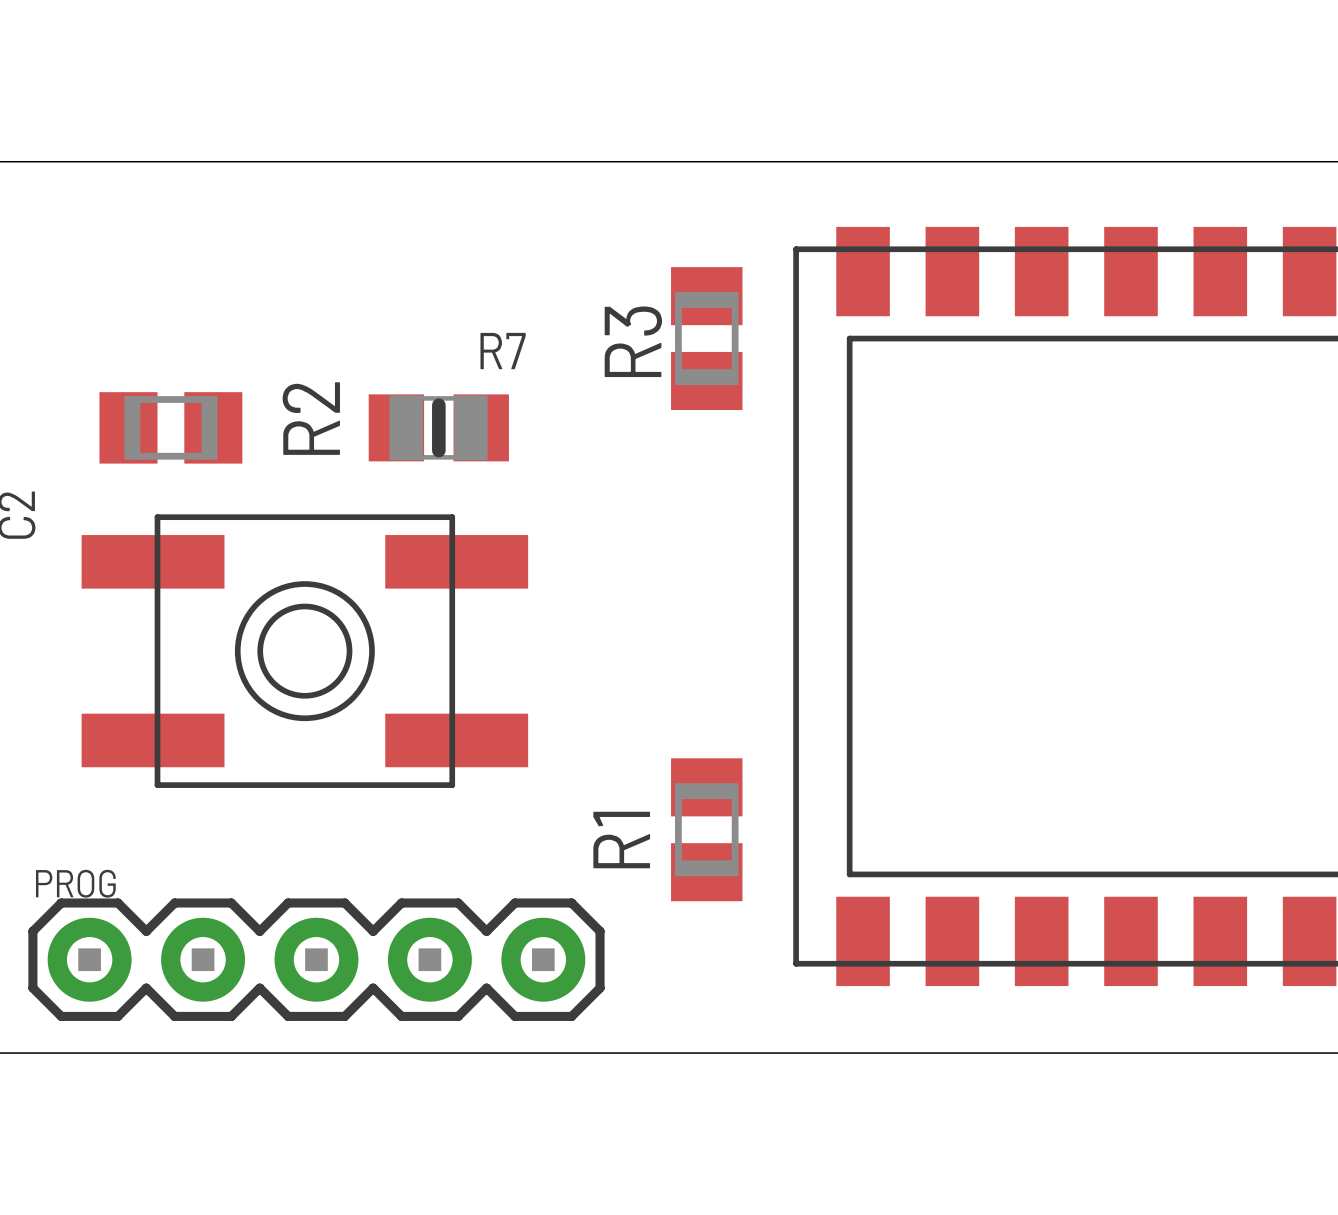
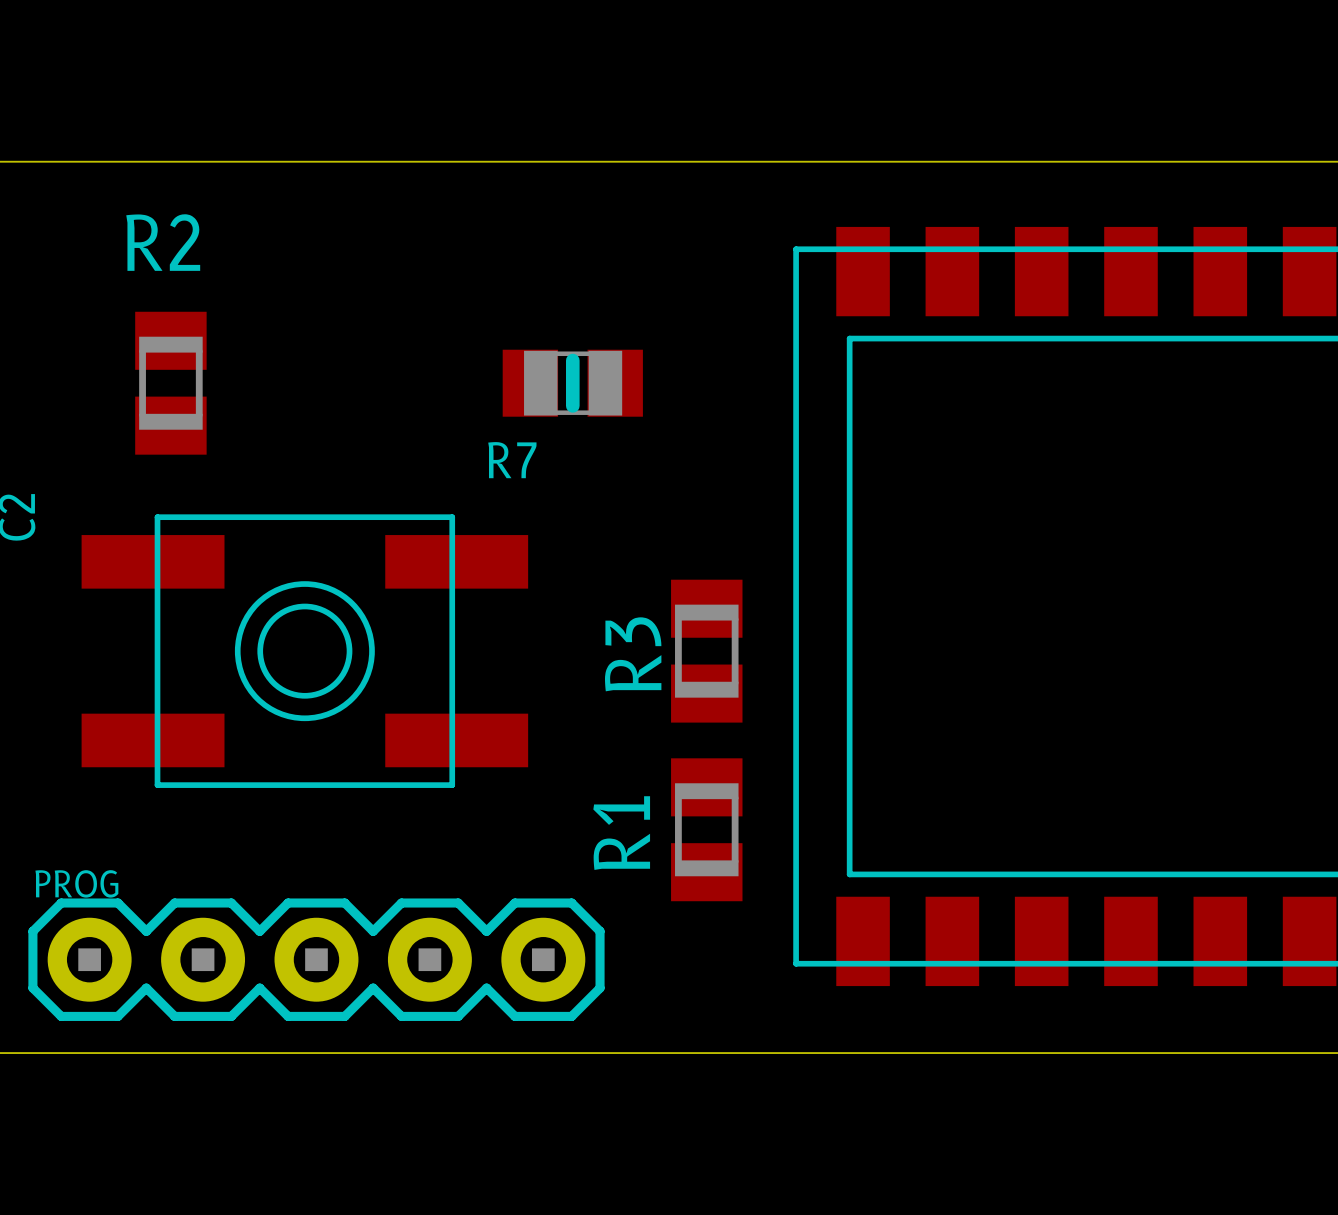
R3 position: (706, 338) -> (706, 651)
R7 name position: R7 (503, 351) -> R7 (512, 460)
R2 name position: R2 (311, 418) -> R2 (163, 242)
R2 rotation: 0° (170, 427) -> 90° clockwise (170, 383)
R7 position: (438, 427) -> (572, 383)

